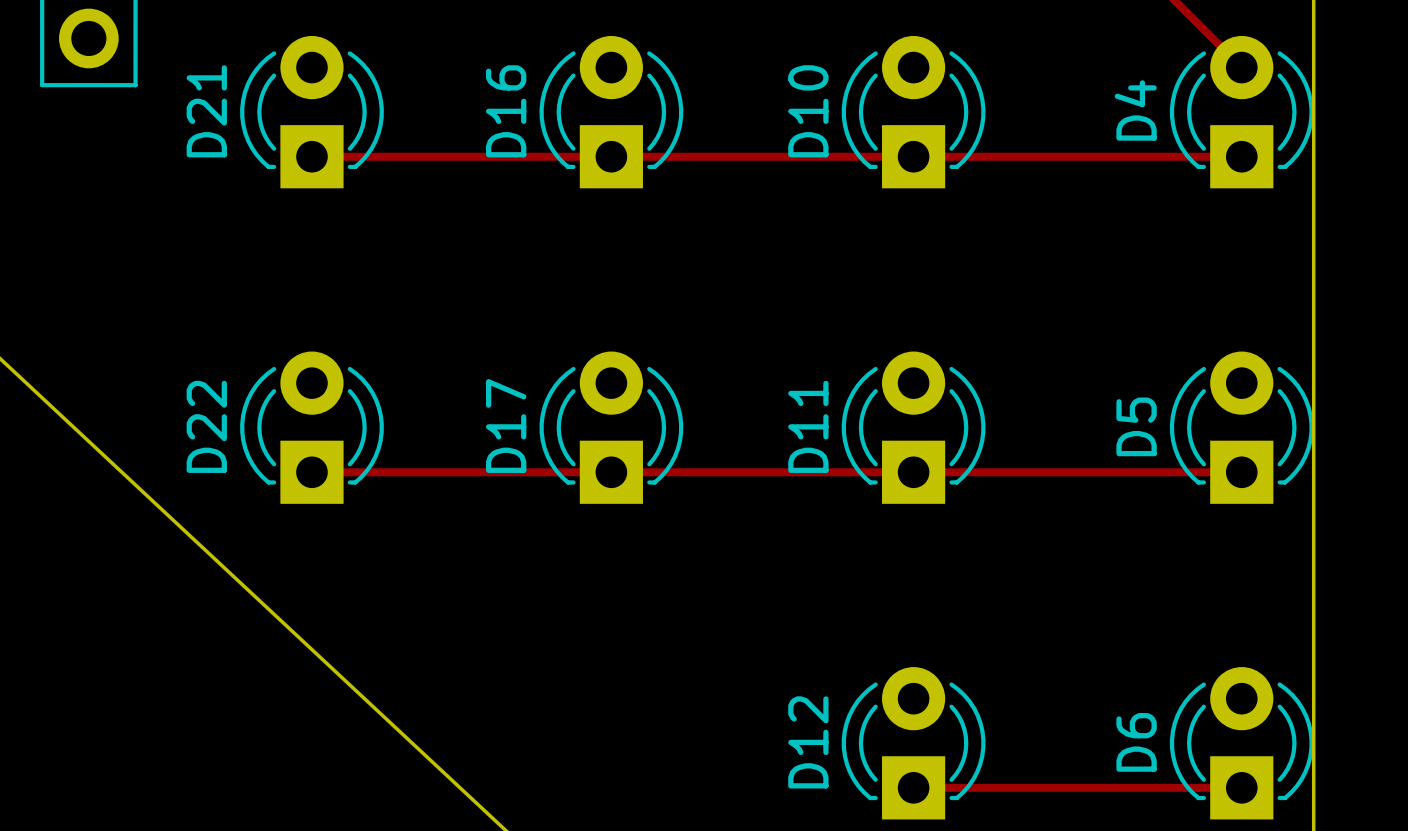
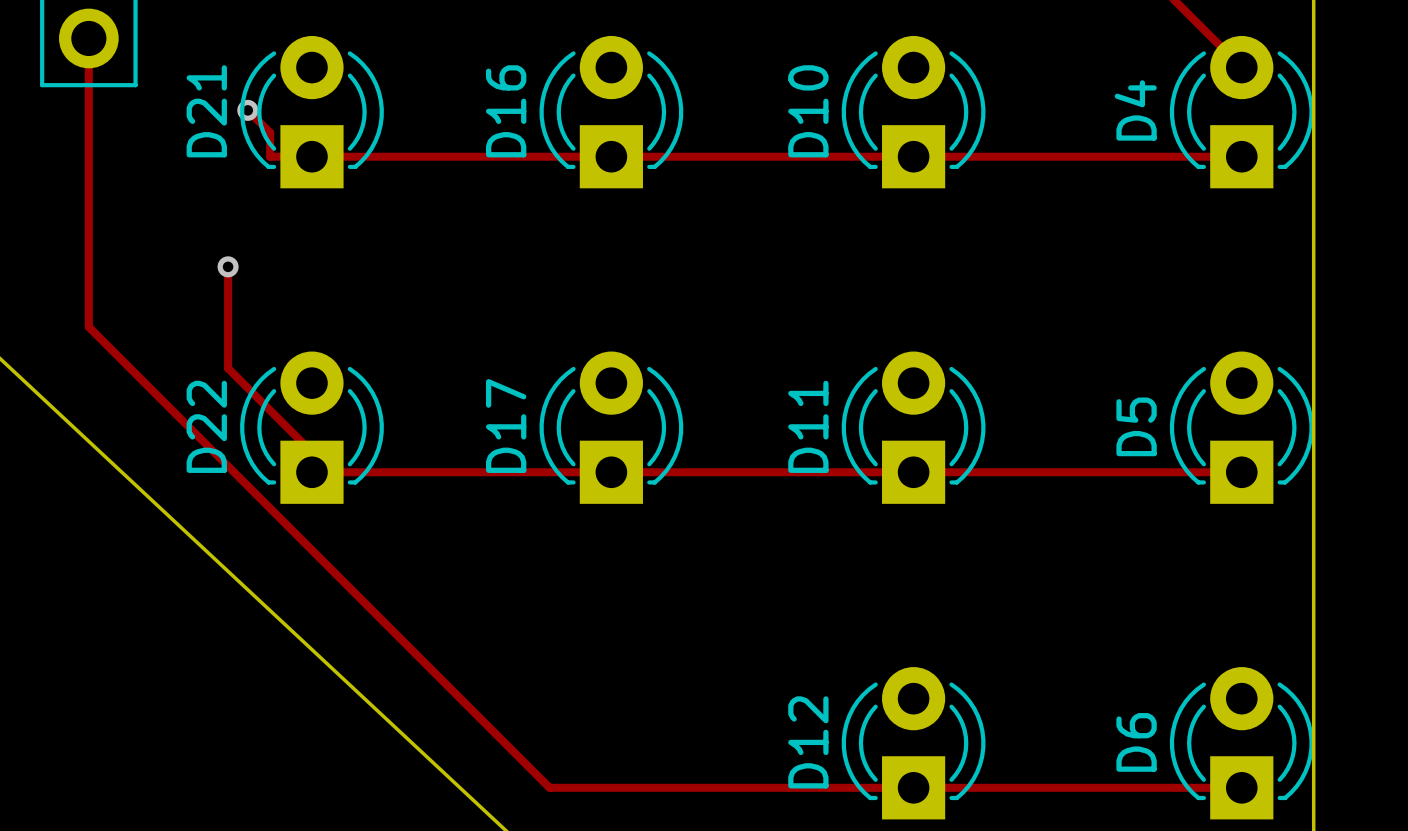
track: none -> (88, 38) (88, 327) (549, 787) (913, 787)
track: none -> (247, 110) (270, 132) (270, 156) (311, 156)
via: none -> (247, 110)
track: none -> (228, 266) (228, 368) (332, 472)
via: none -> (228, 266)

